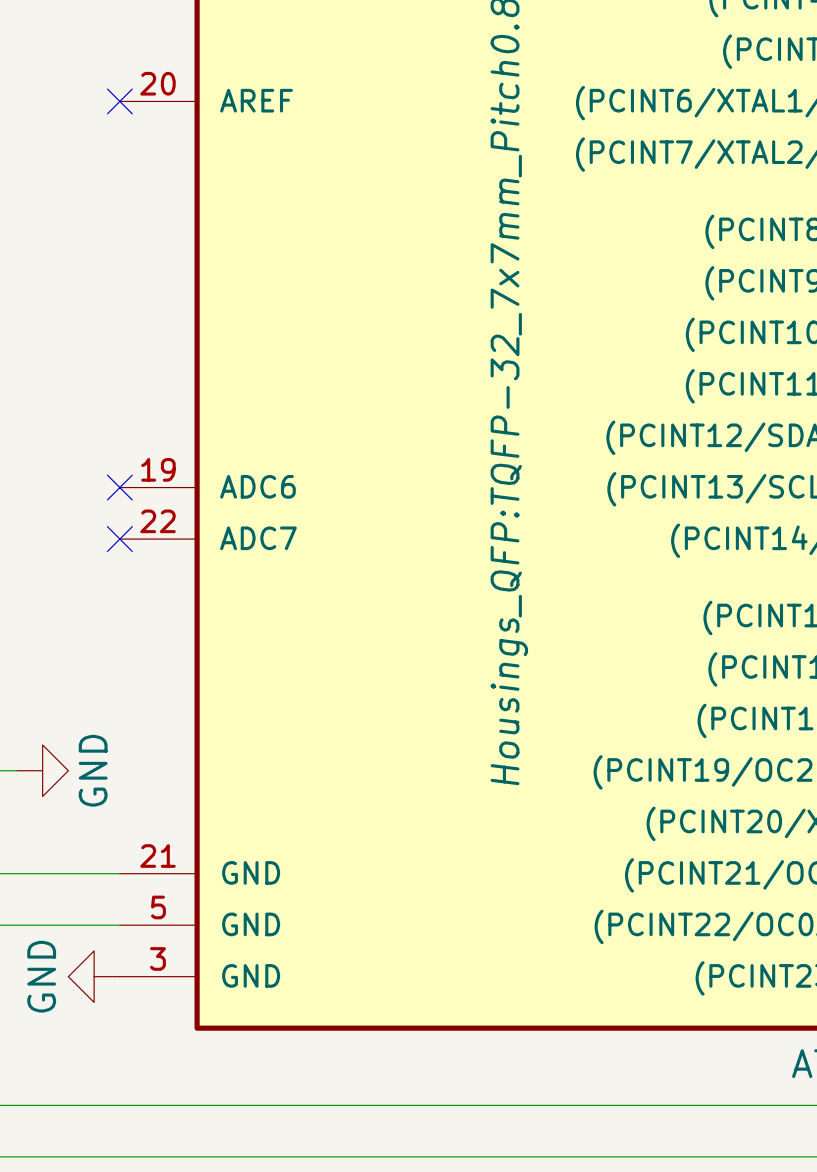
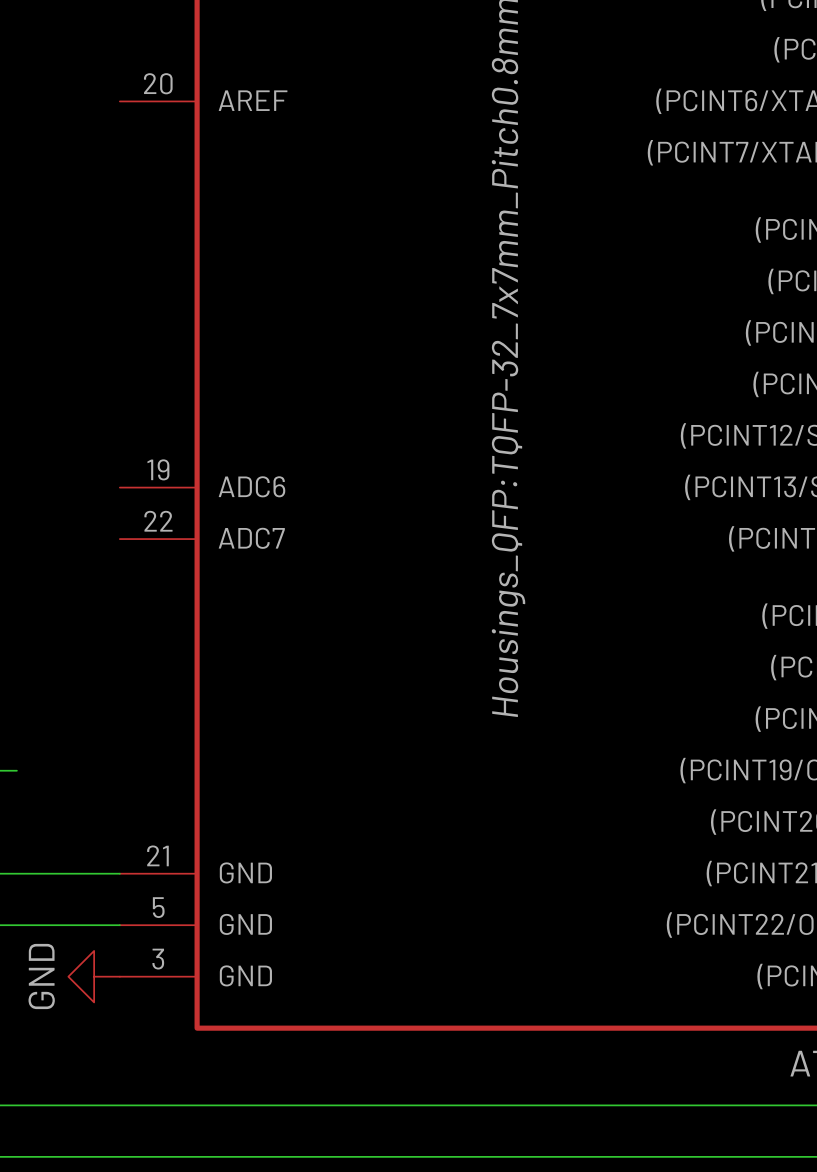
no-connect mark: (119, 101) -> none
no-connect mark: (119, 487) -> none
no-connect mark: (119, 539) -> none
power symbol: GND (42, 770) -> none

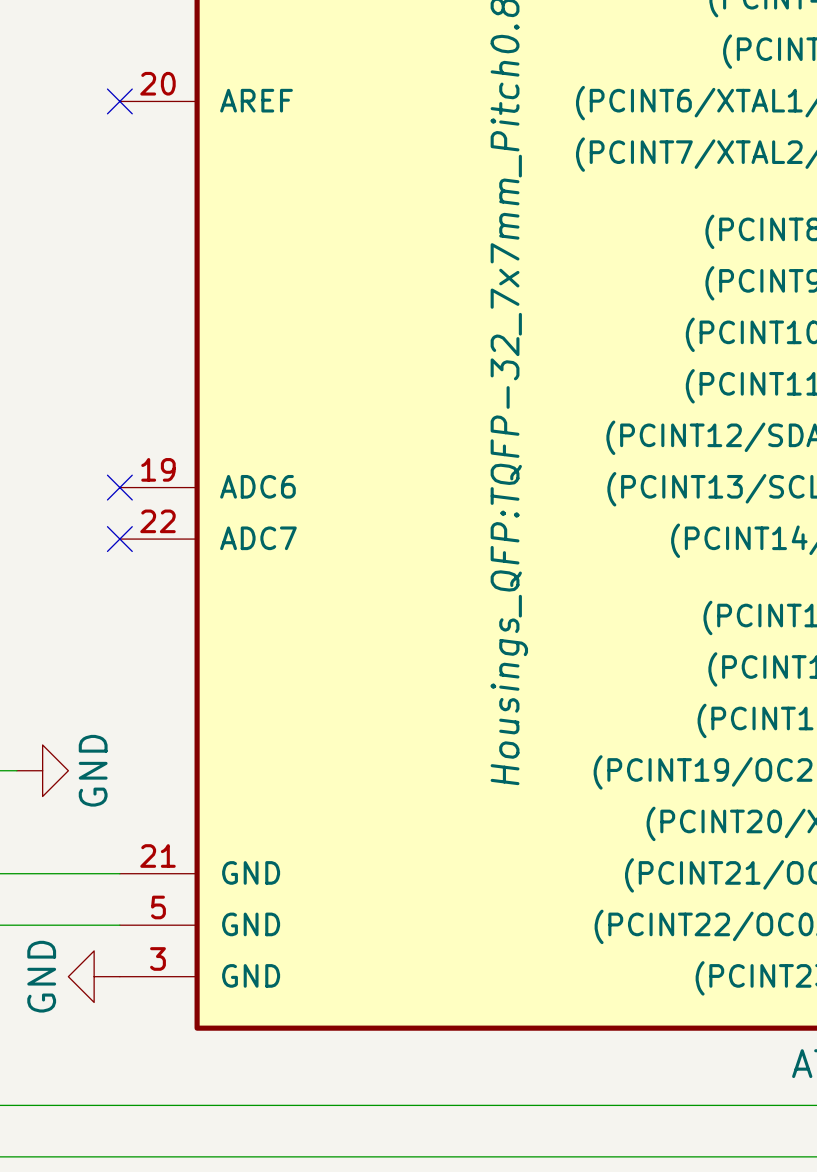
no-connect mark: none -> (119, 101)
no-connect mark: none -> (119, 487)
no-connect mark: none -> (119, 539)
power symbol: none -> GND (42, 770)

